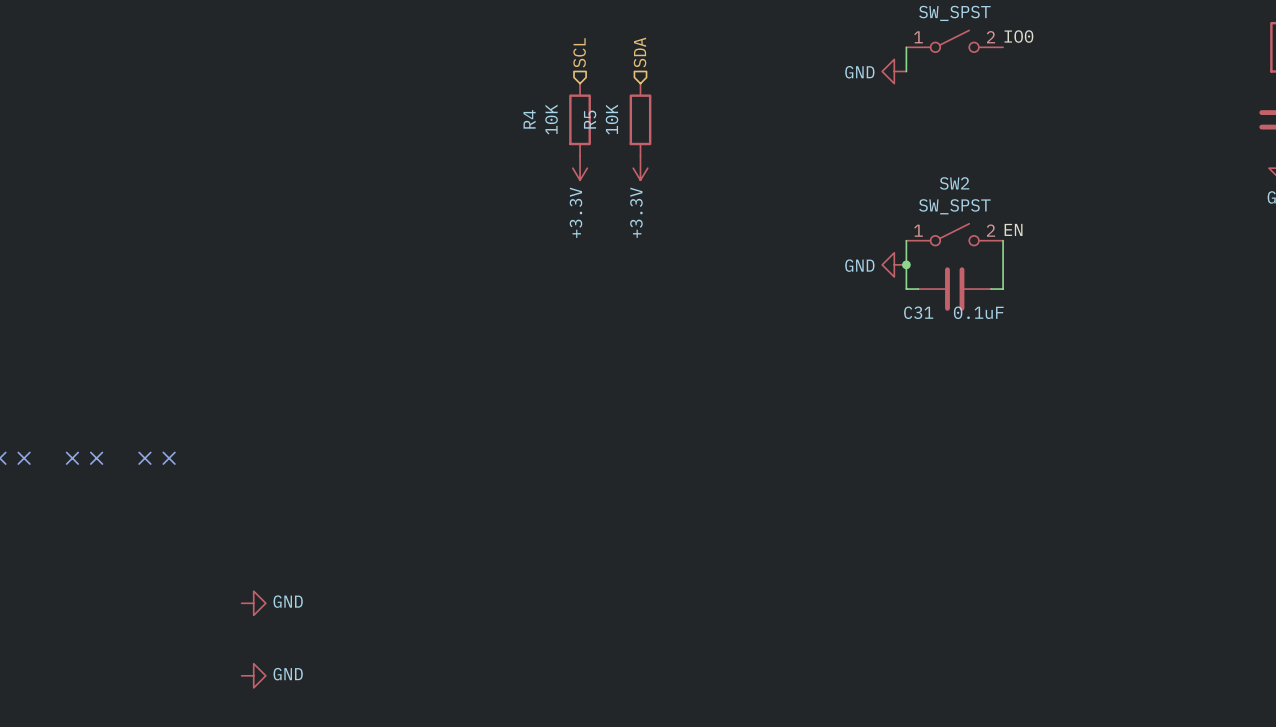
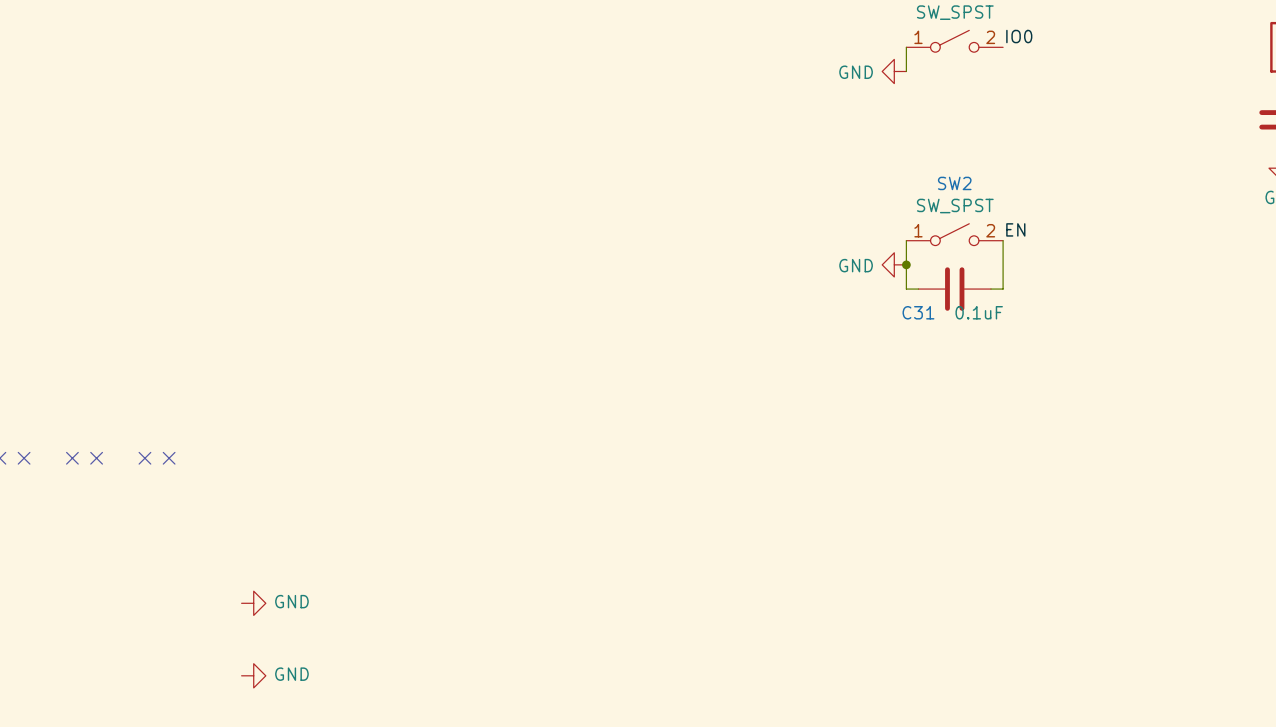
hierarchical label: SCL (579, 52) -> none
hierarchical label: SDA (640, 52) -> none
R4: 10K (580, 119) -> none
R5: 10K (640, 119) -> none
power symbol: +3.3V (580, 168) -> none
power symbol: +3.3V (640, 168) -> none

